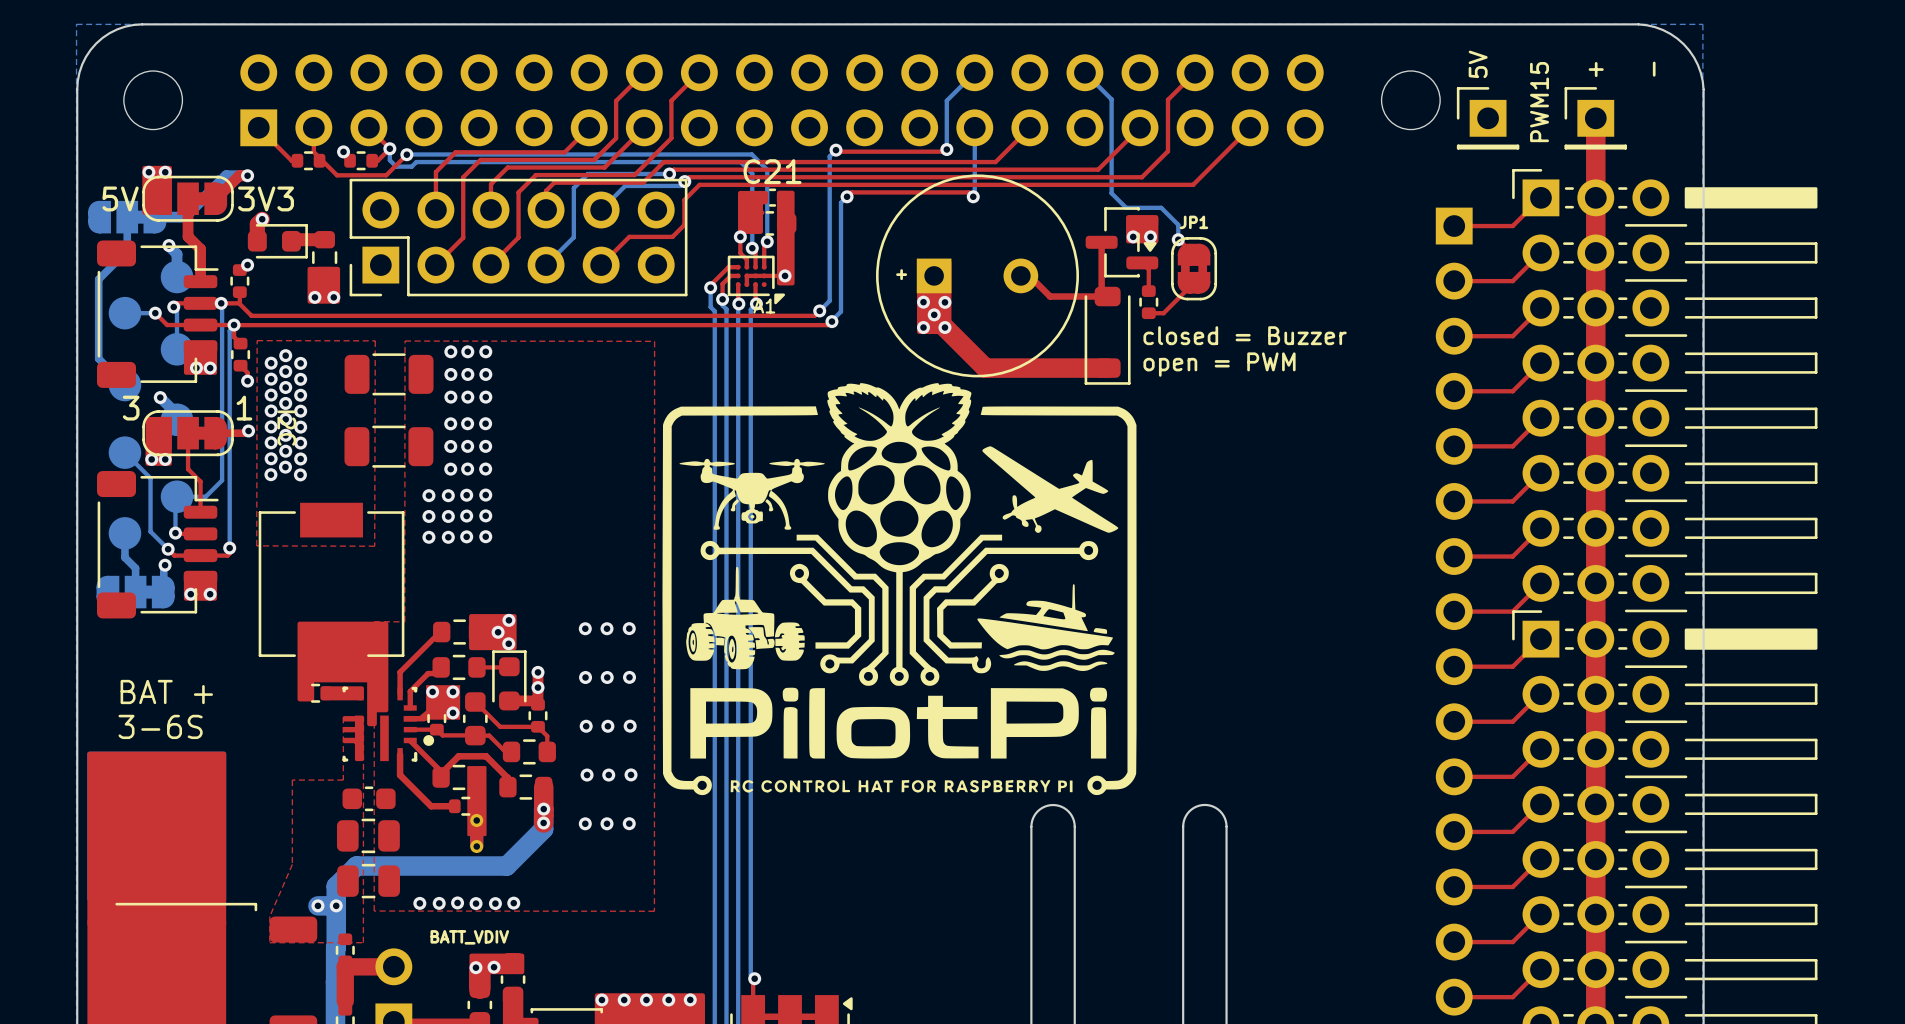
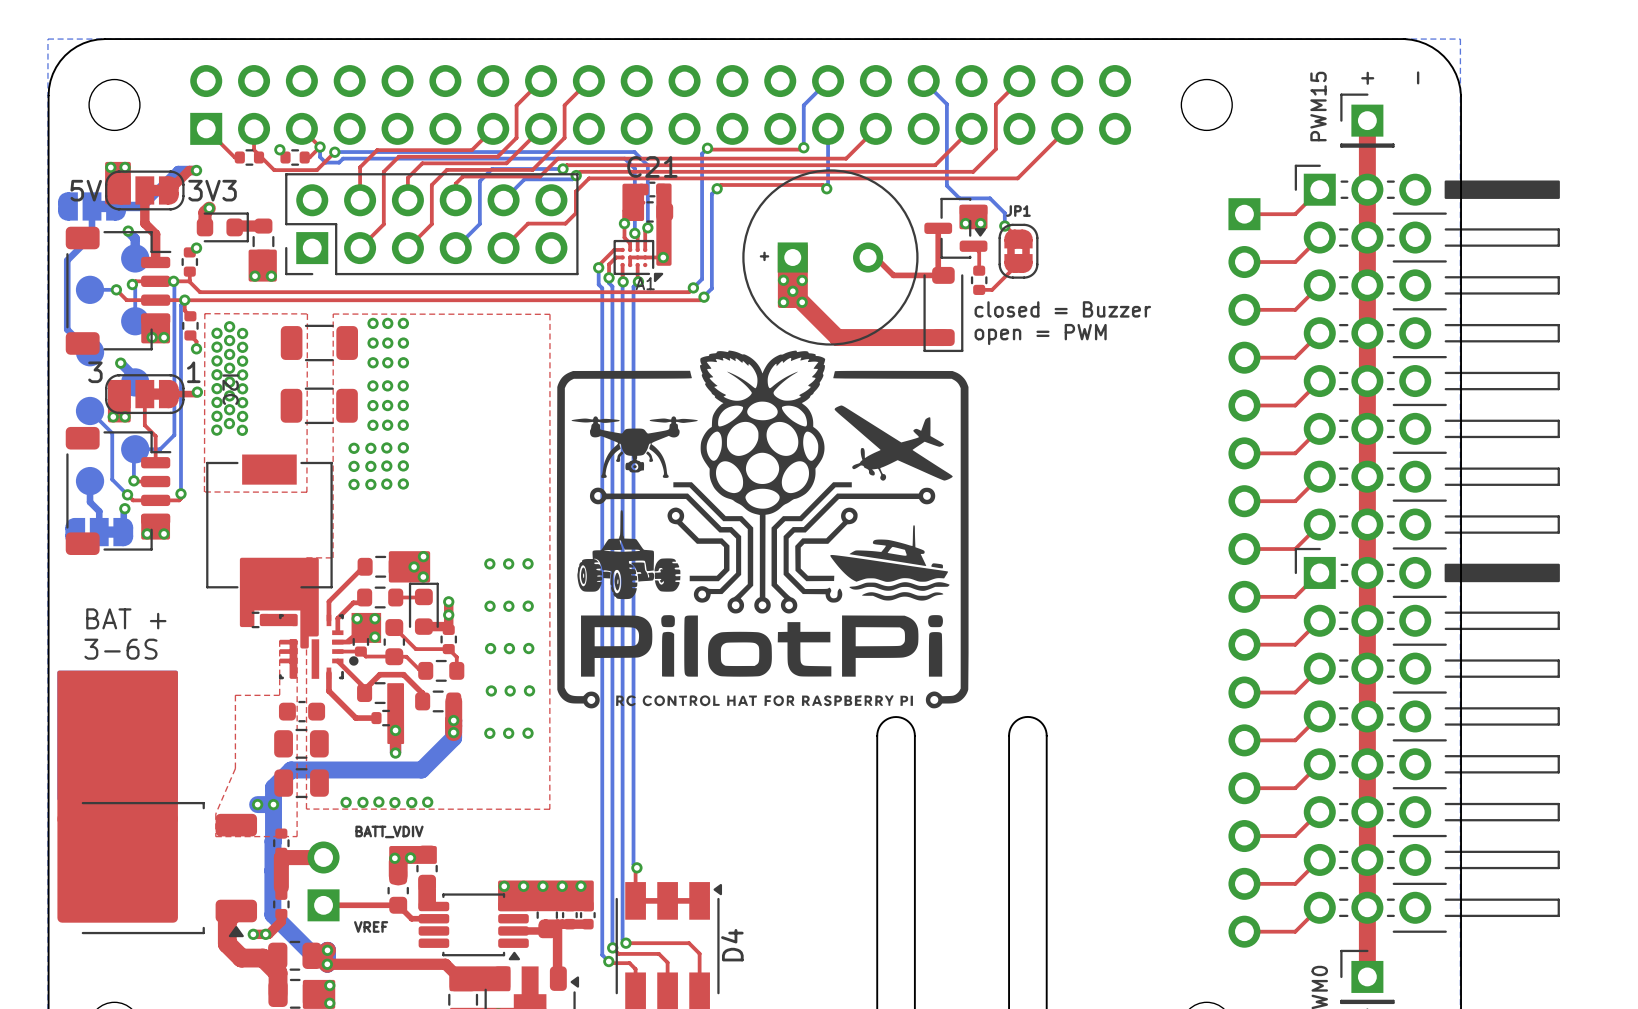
text: 5V (1478, 64) -> none
part: (1488, 118) -> none

